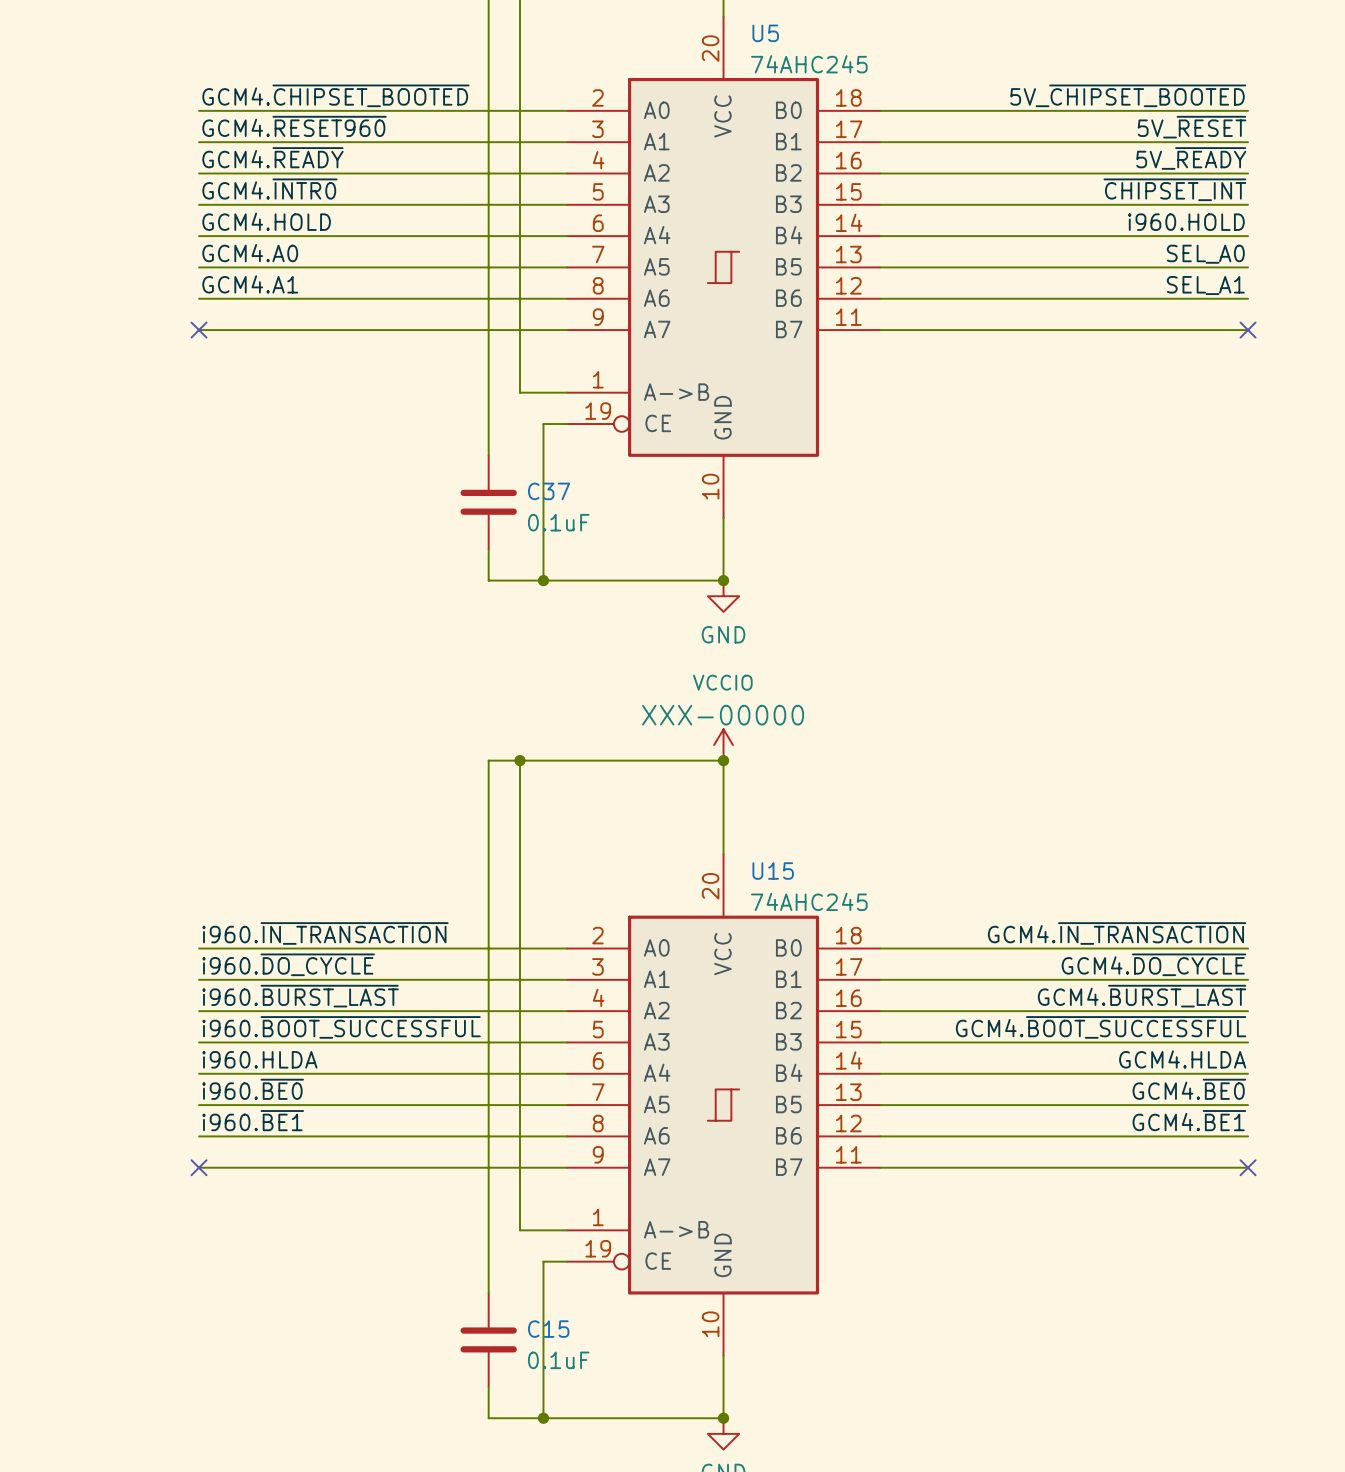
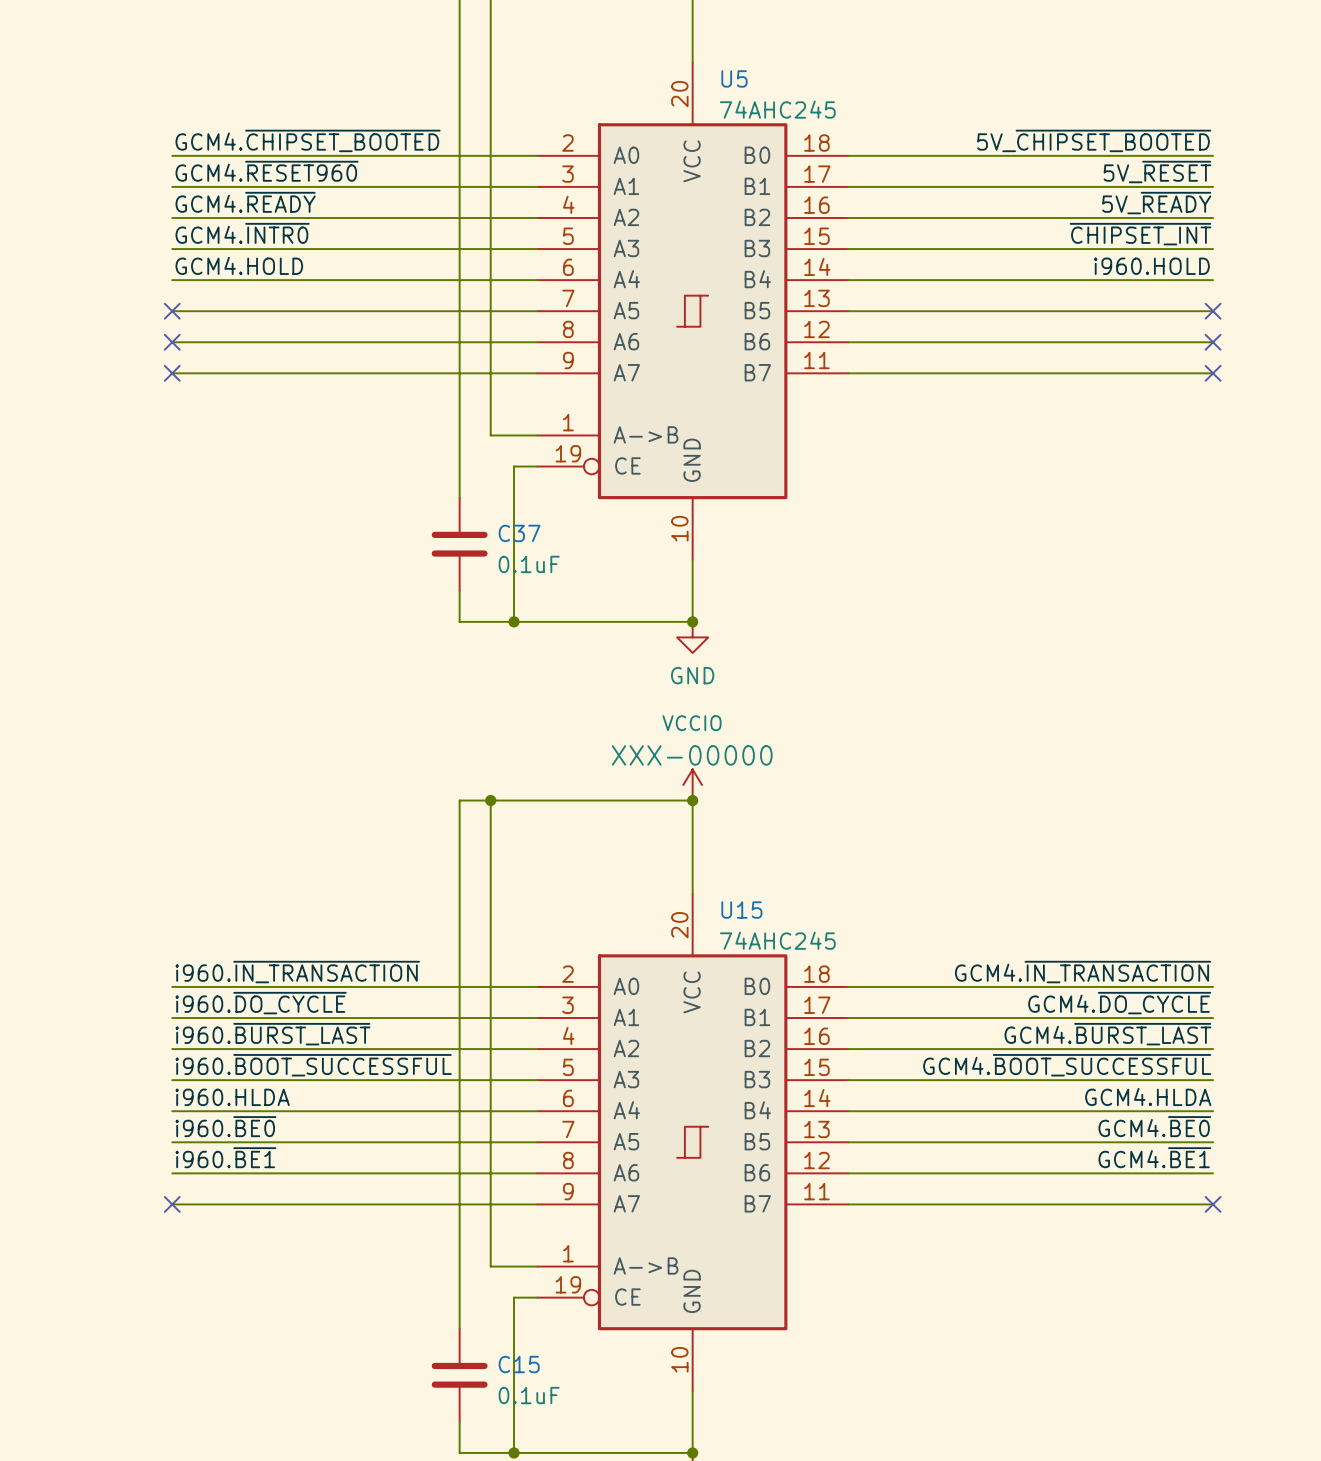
label: GCM4.A0 (250, 253) -> none
label: SEL_A0 (1205, 254) -> none
no-connect mark: none -> (172, 311)
no-connect mark: none -> (1213, 311)
label: GCM4.A1 (250, 284) -> none
label: SEL_A1 (1205, 285) -> none
no-connect mark: none -> (172, 342)
no-connect mark: none -> (1213, 342)

